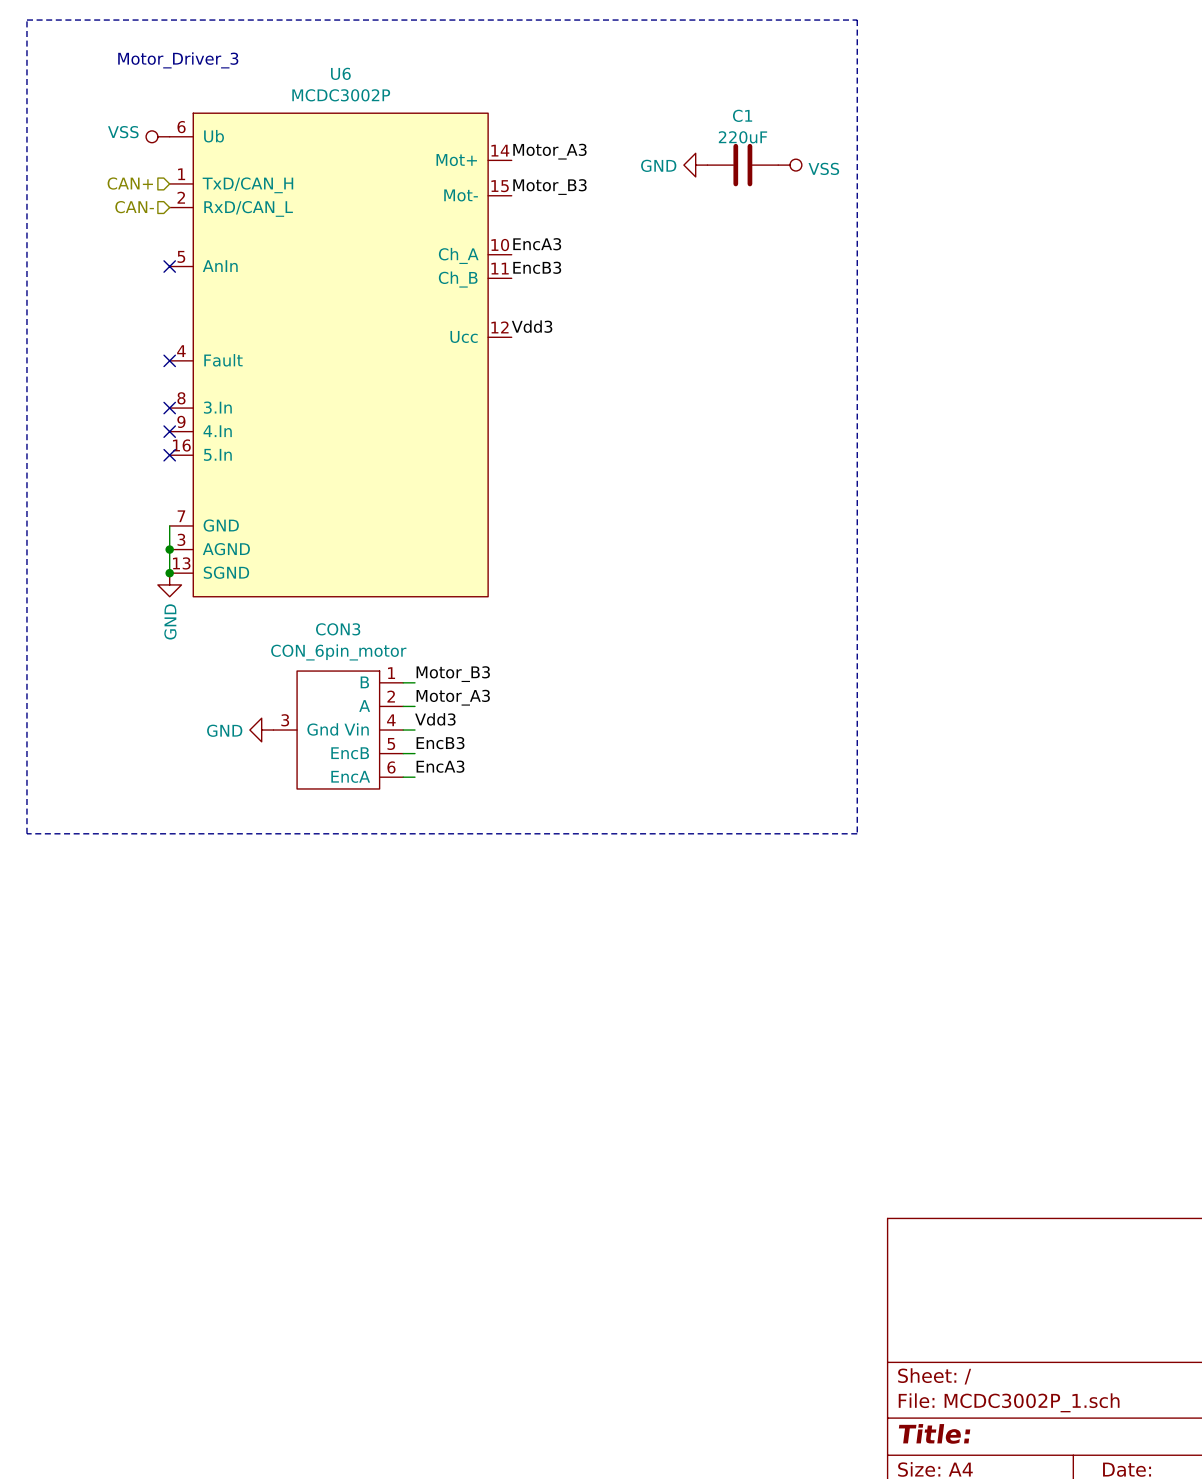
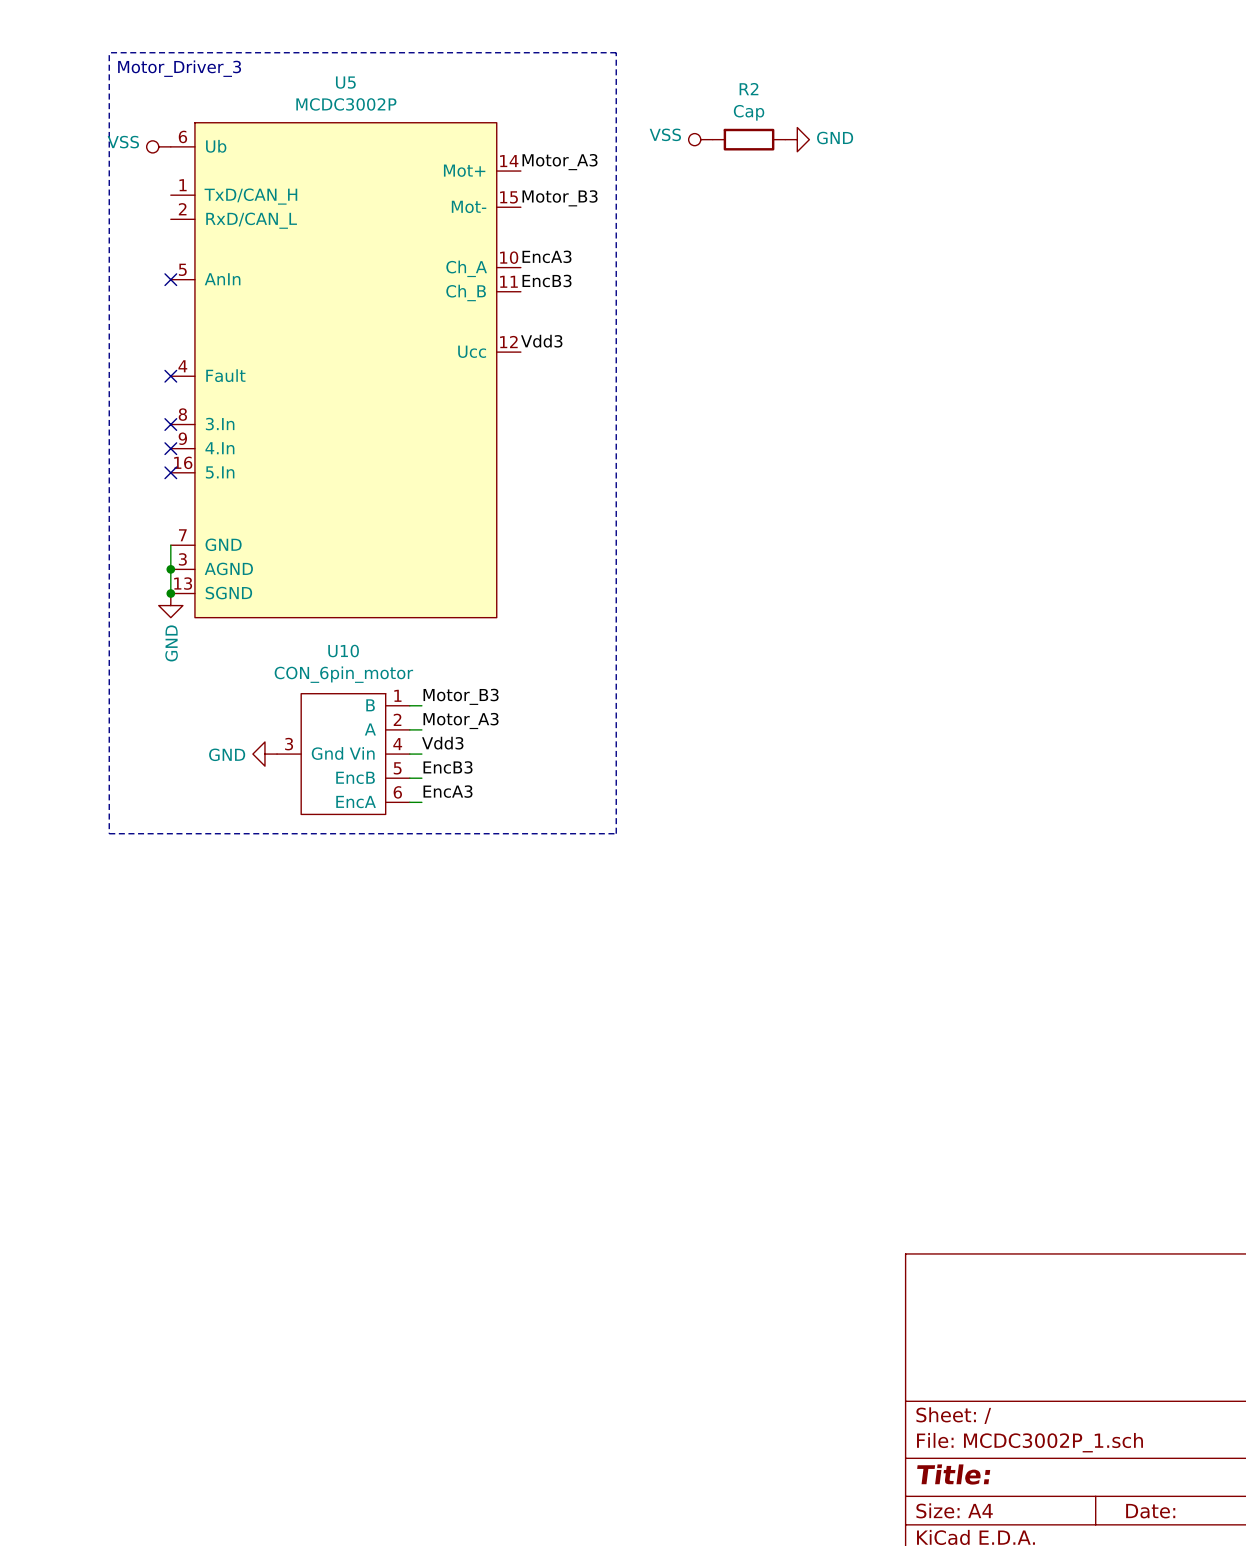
line: (26, 20) (857, 20) (857, 833) (26, 833) (26, 20) -> none
line: none -> (109, 52) (616, 52) (616, 833) (109, 833) (109, 55)
U6 name: U6 (340, 73) -> U5 (345, 82)
R2: none -> Cap (749, 139)
power symbol rotation: 0° (695, 165) -> 180° (797, 139)
power symbol position: GND (695, 165) -> GND (797, 139)
C1: 220uF (742, 165) -> none
power symbol rotation: 0° (790, 165) -> 180° (700, 139)
power symbol position: VSS (790, 165) -> VSS (700, 139)
hierarchical label: CAN+ (130, 183) -> none
hierarchical label: CAN- (134, 207) -> none
CON3 name: CON3 (338, 629) -> U10 (343, 651)

